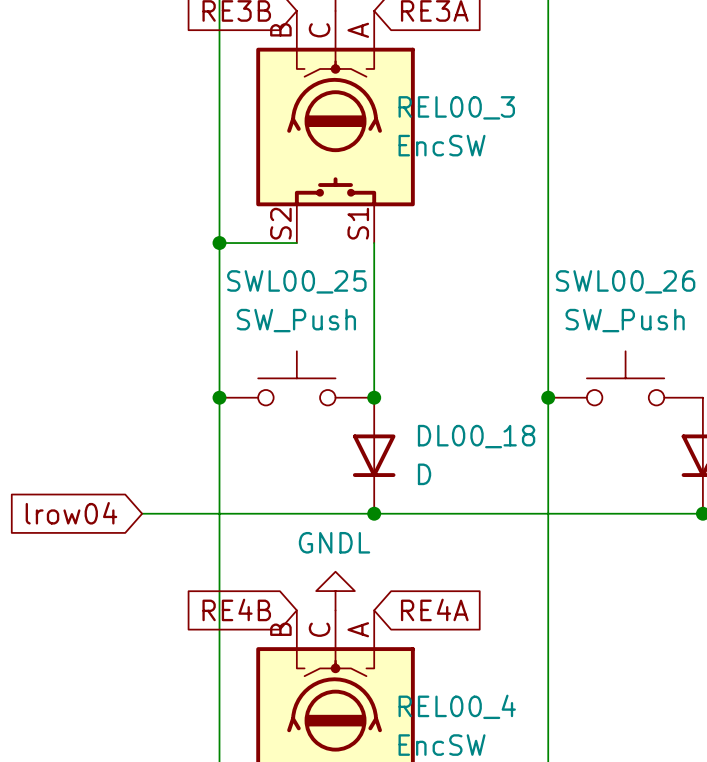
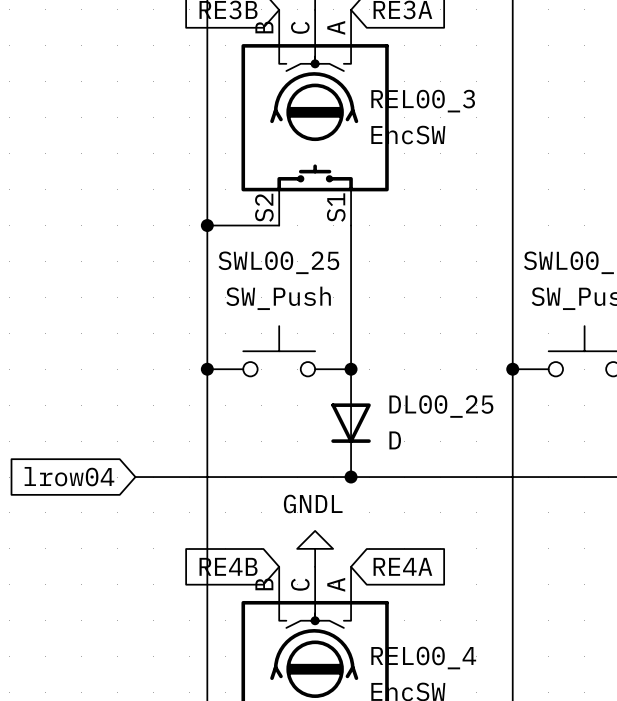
DL00_18 name: DL00_18 (476, 436) -> DL00_25 (441, 406)

